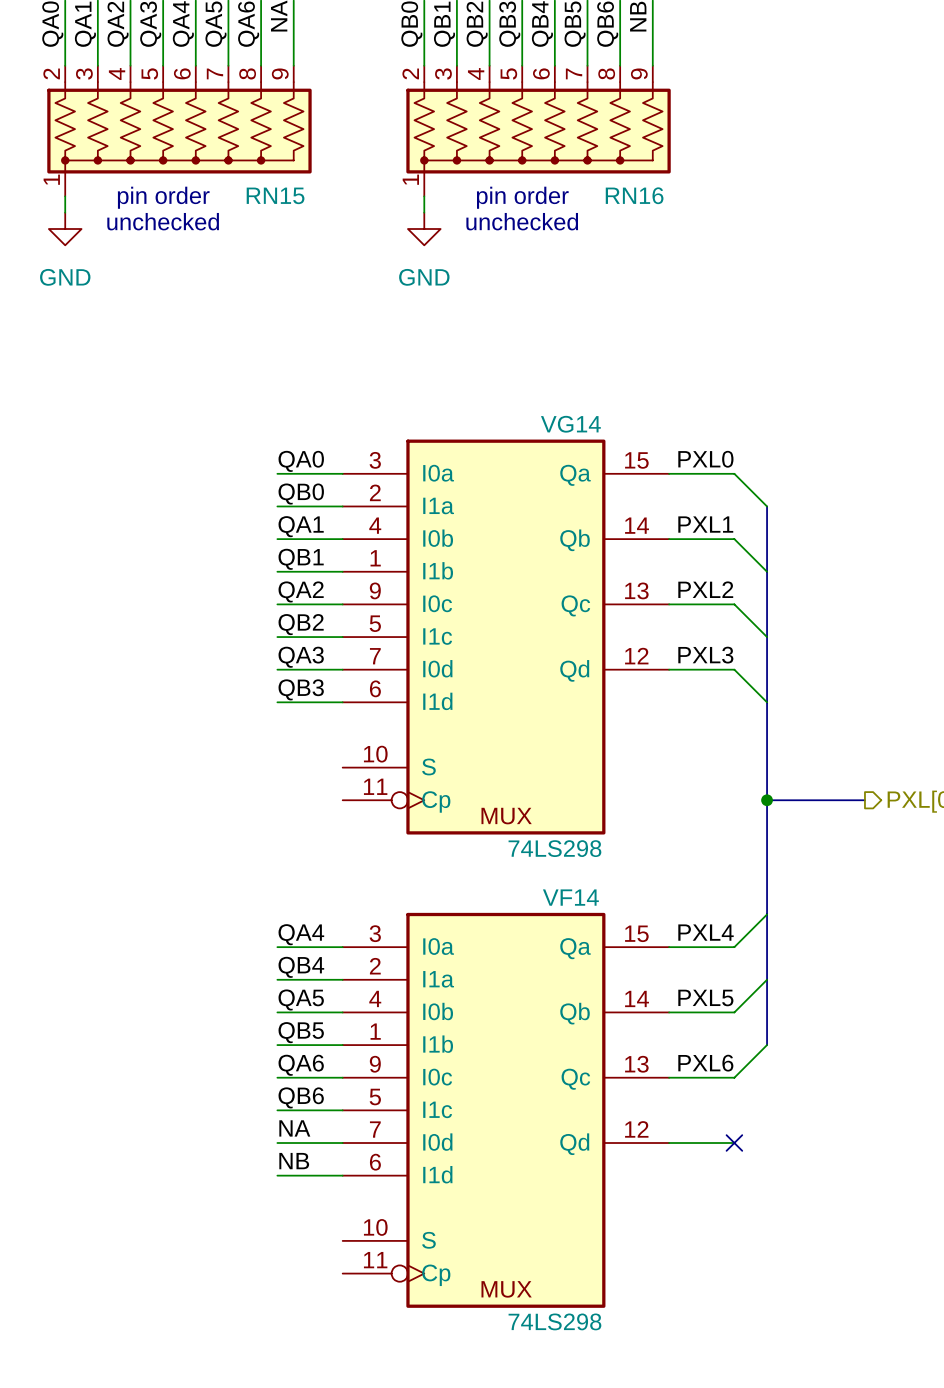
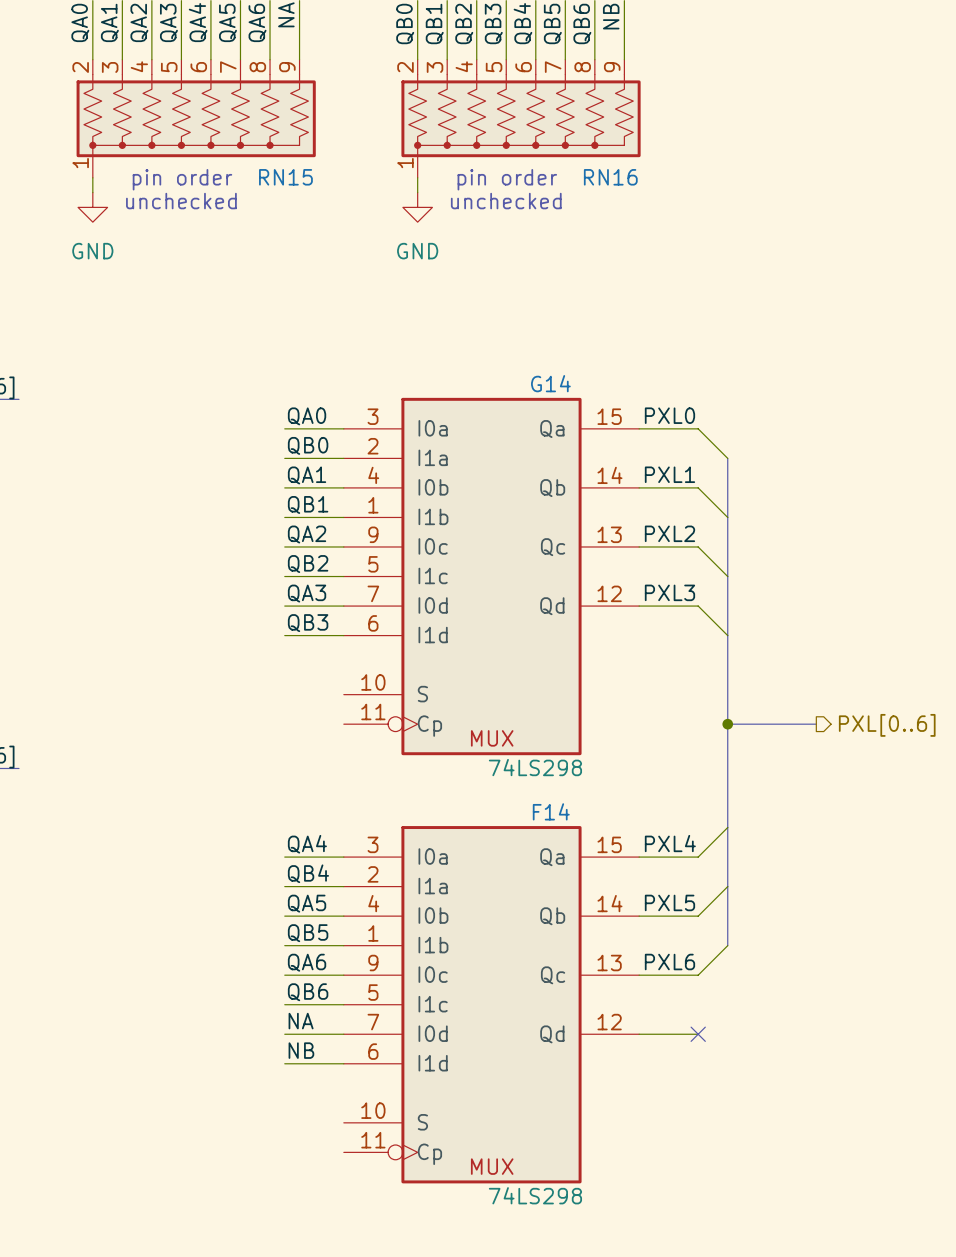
VG14 name: VG14 (570, 424) -> G14 (550, 383)
VF14 name: VF14 (570, 897) -> F14 (551, 811)

